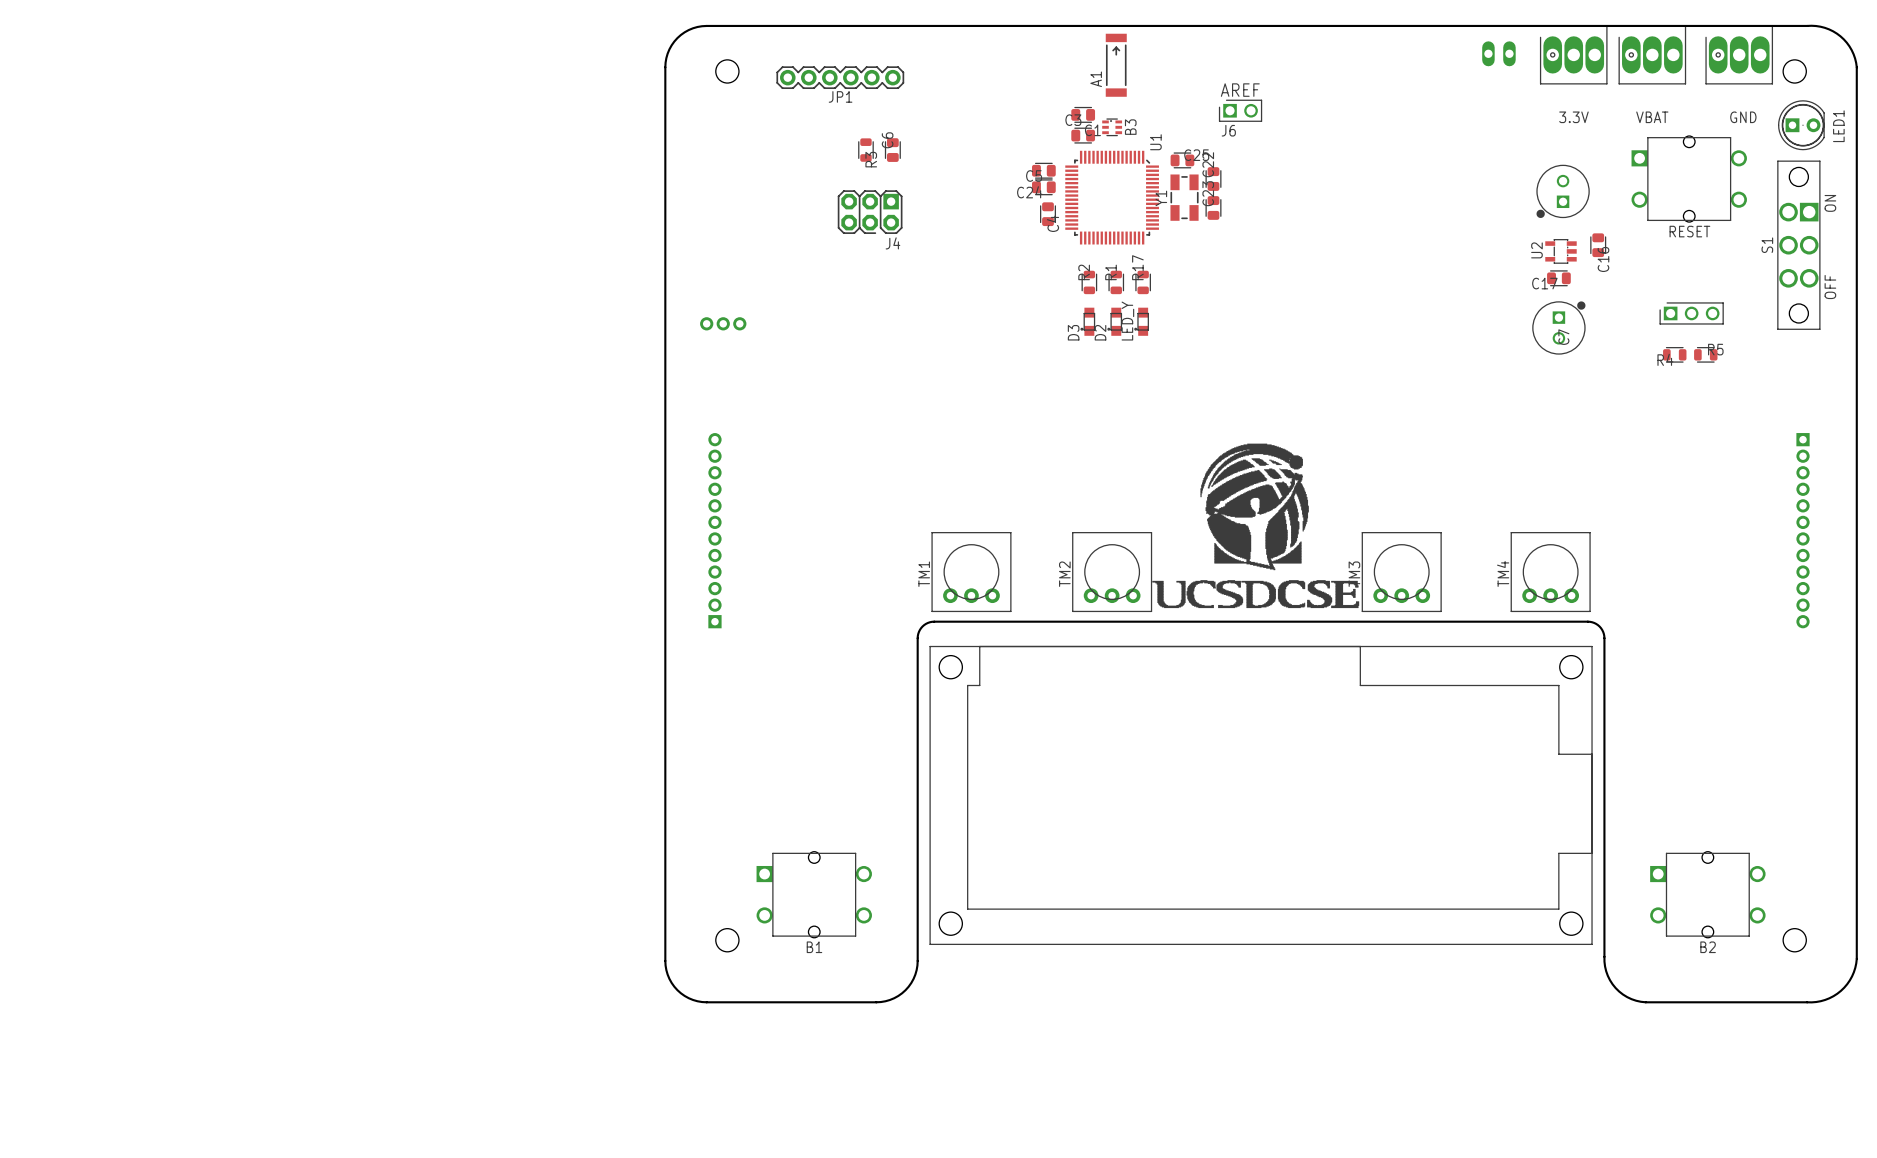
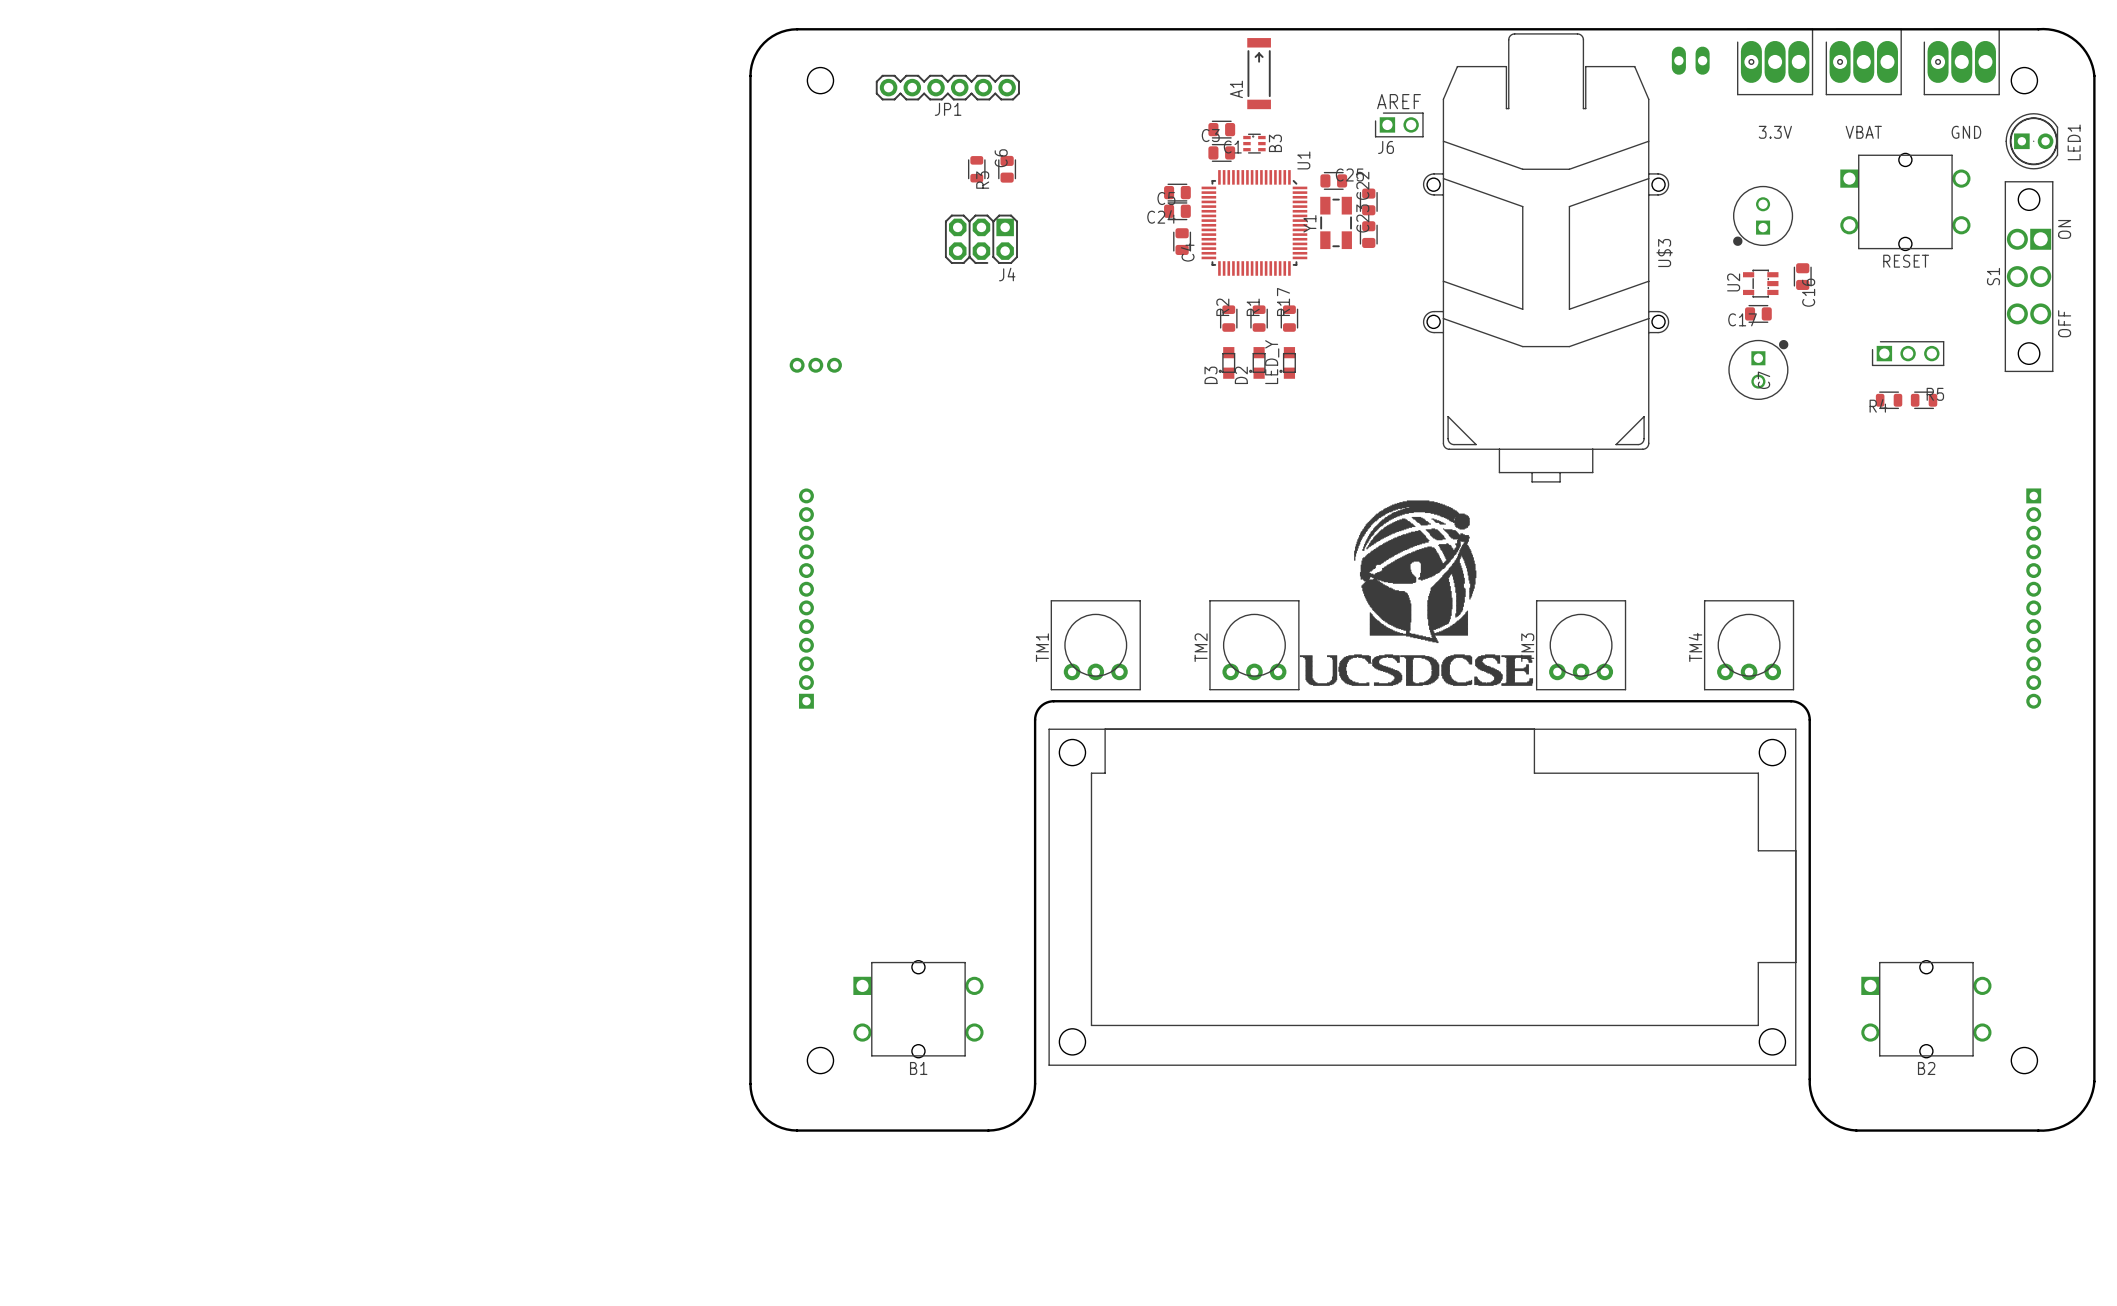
U$3: none -> (1546, 257)

